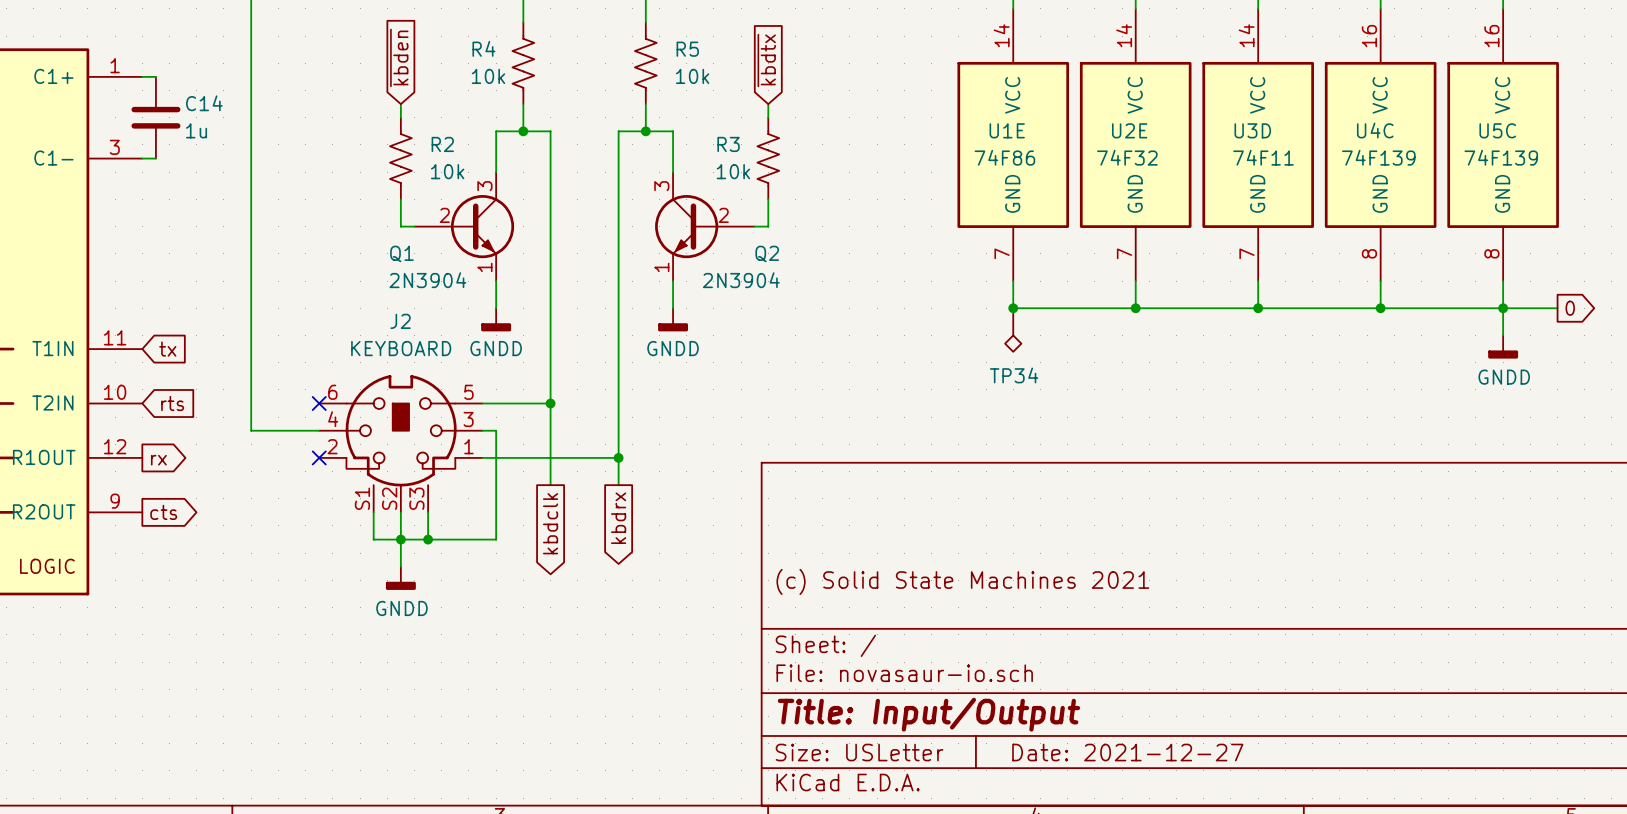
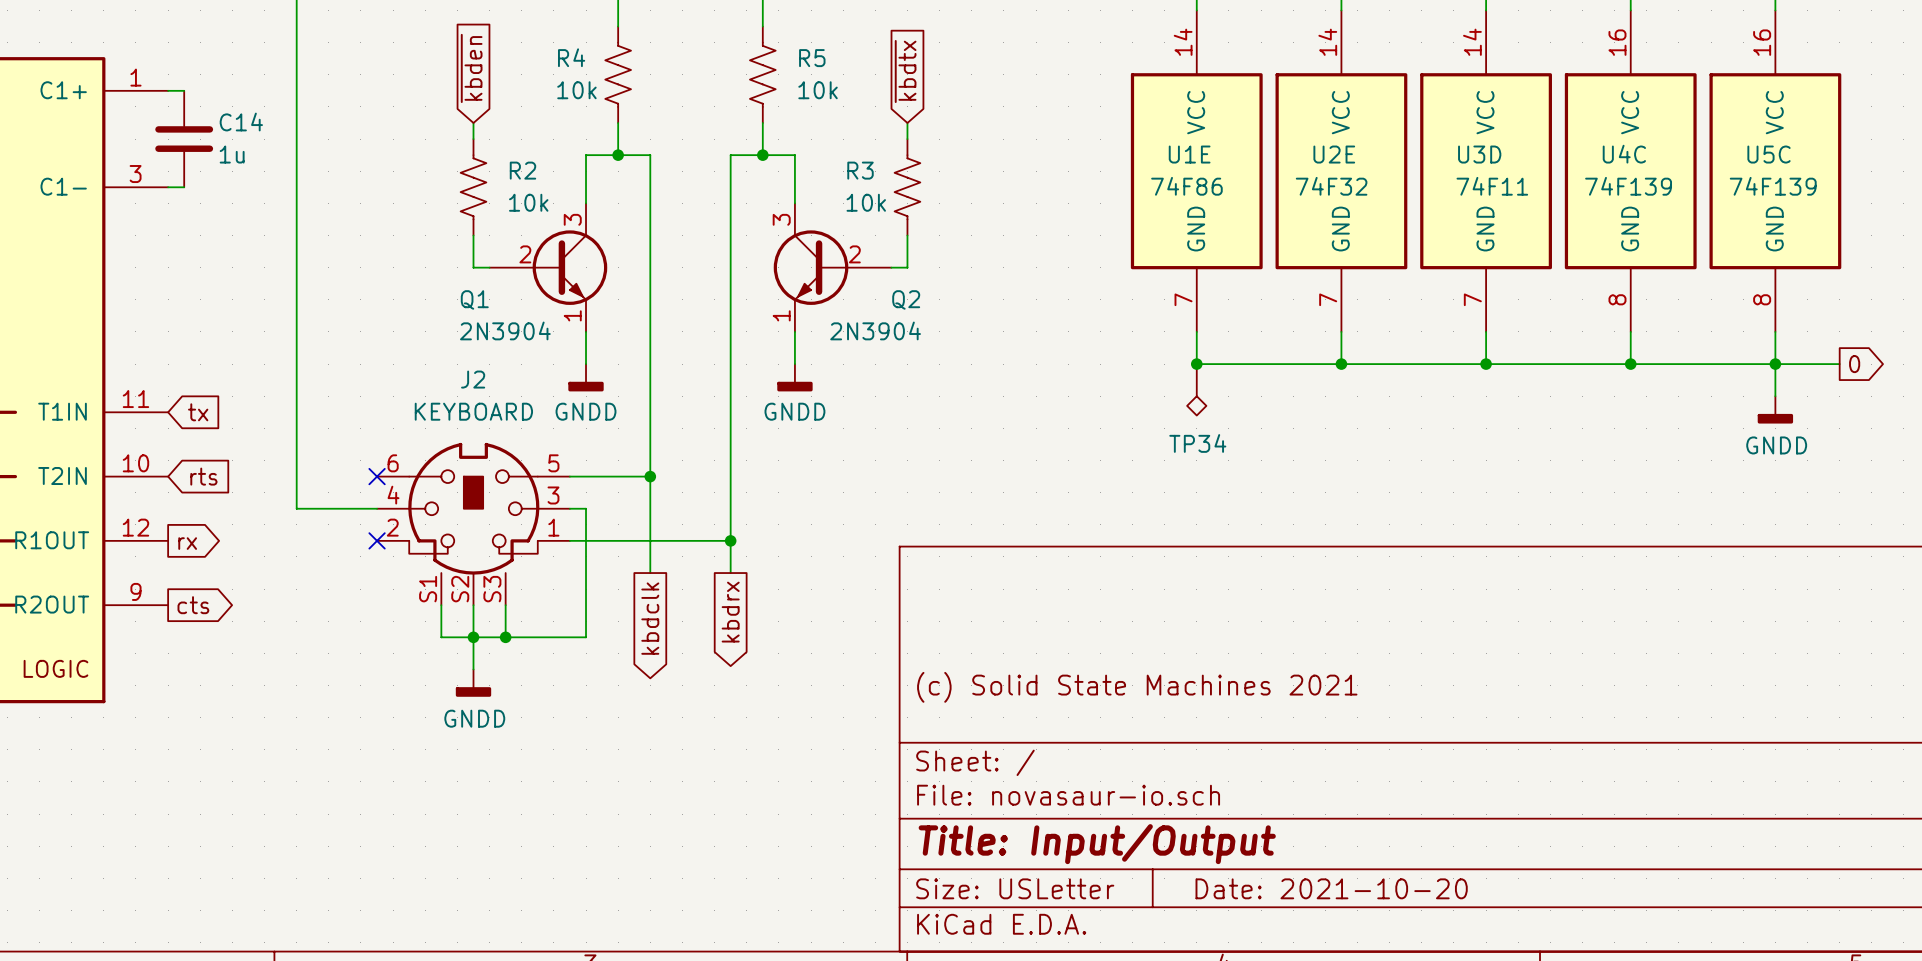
title block: Date: 2021-12-27 (1127, 752) -> Date: 2021-10-20 (1331, 888)

